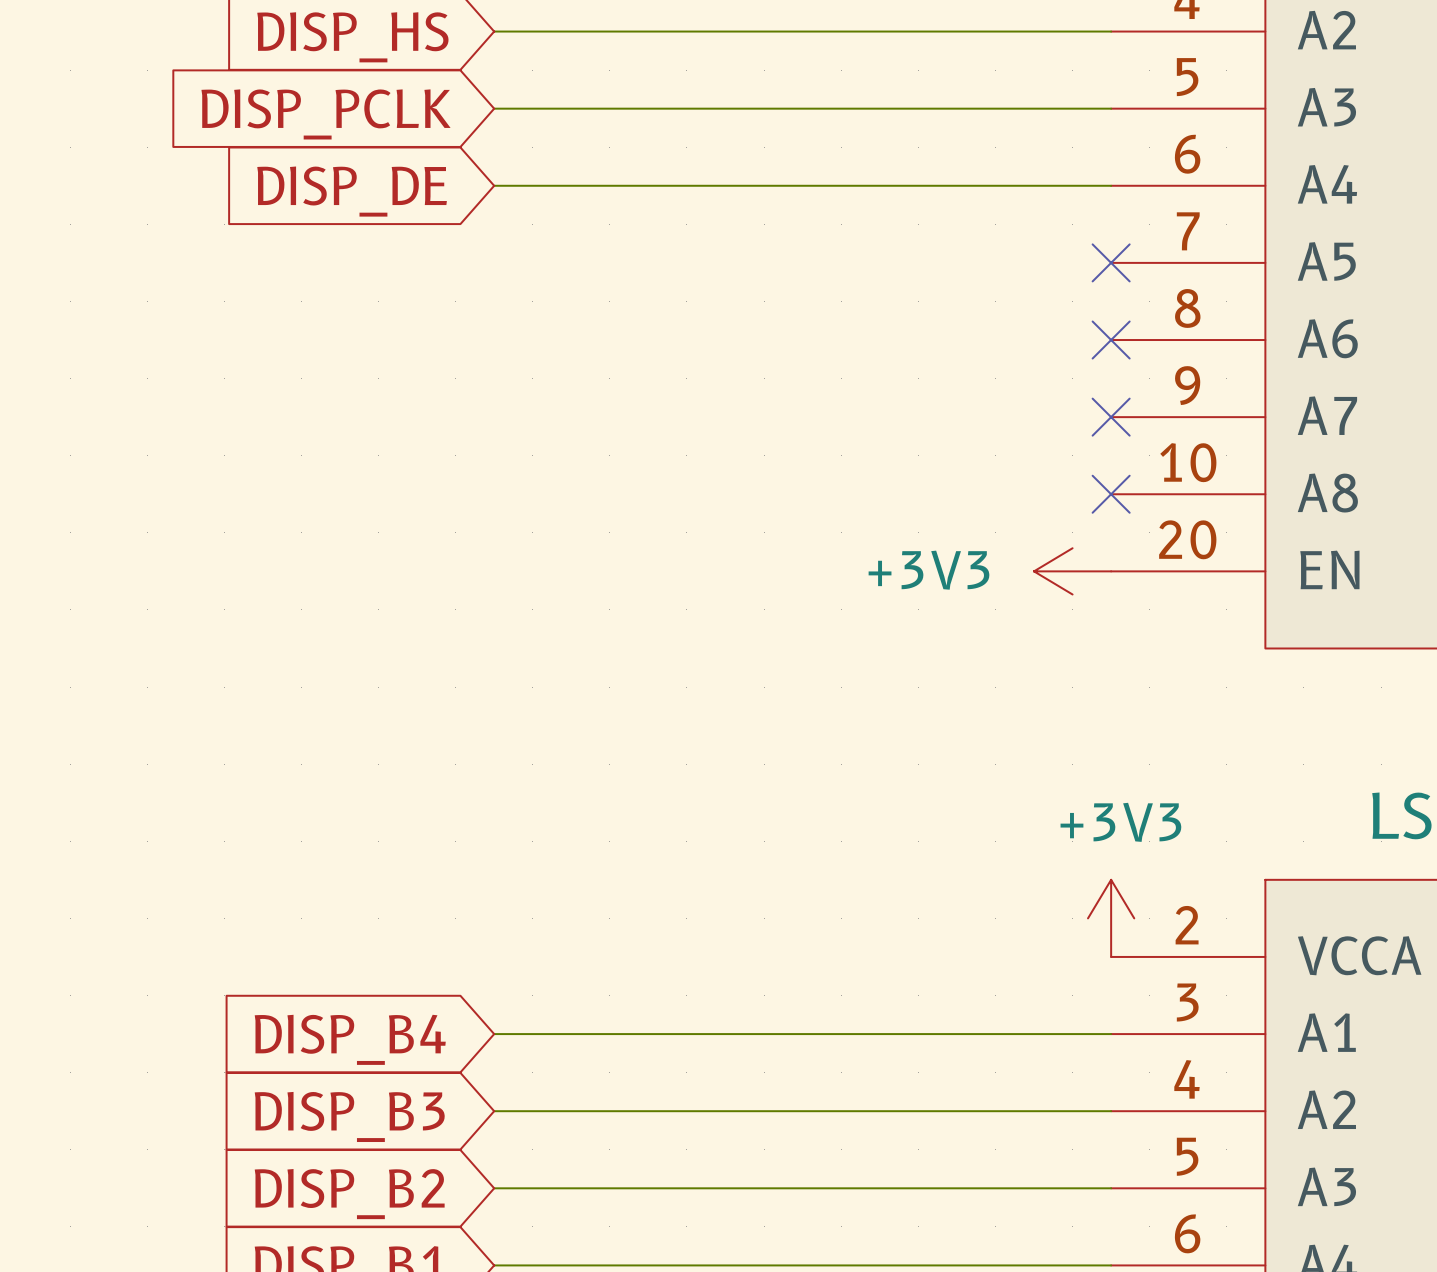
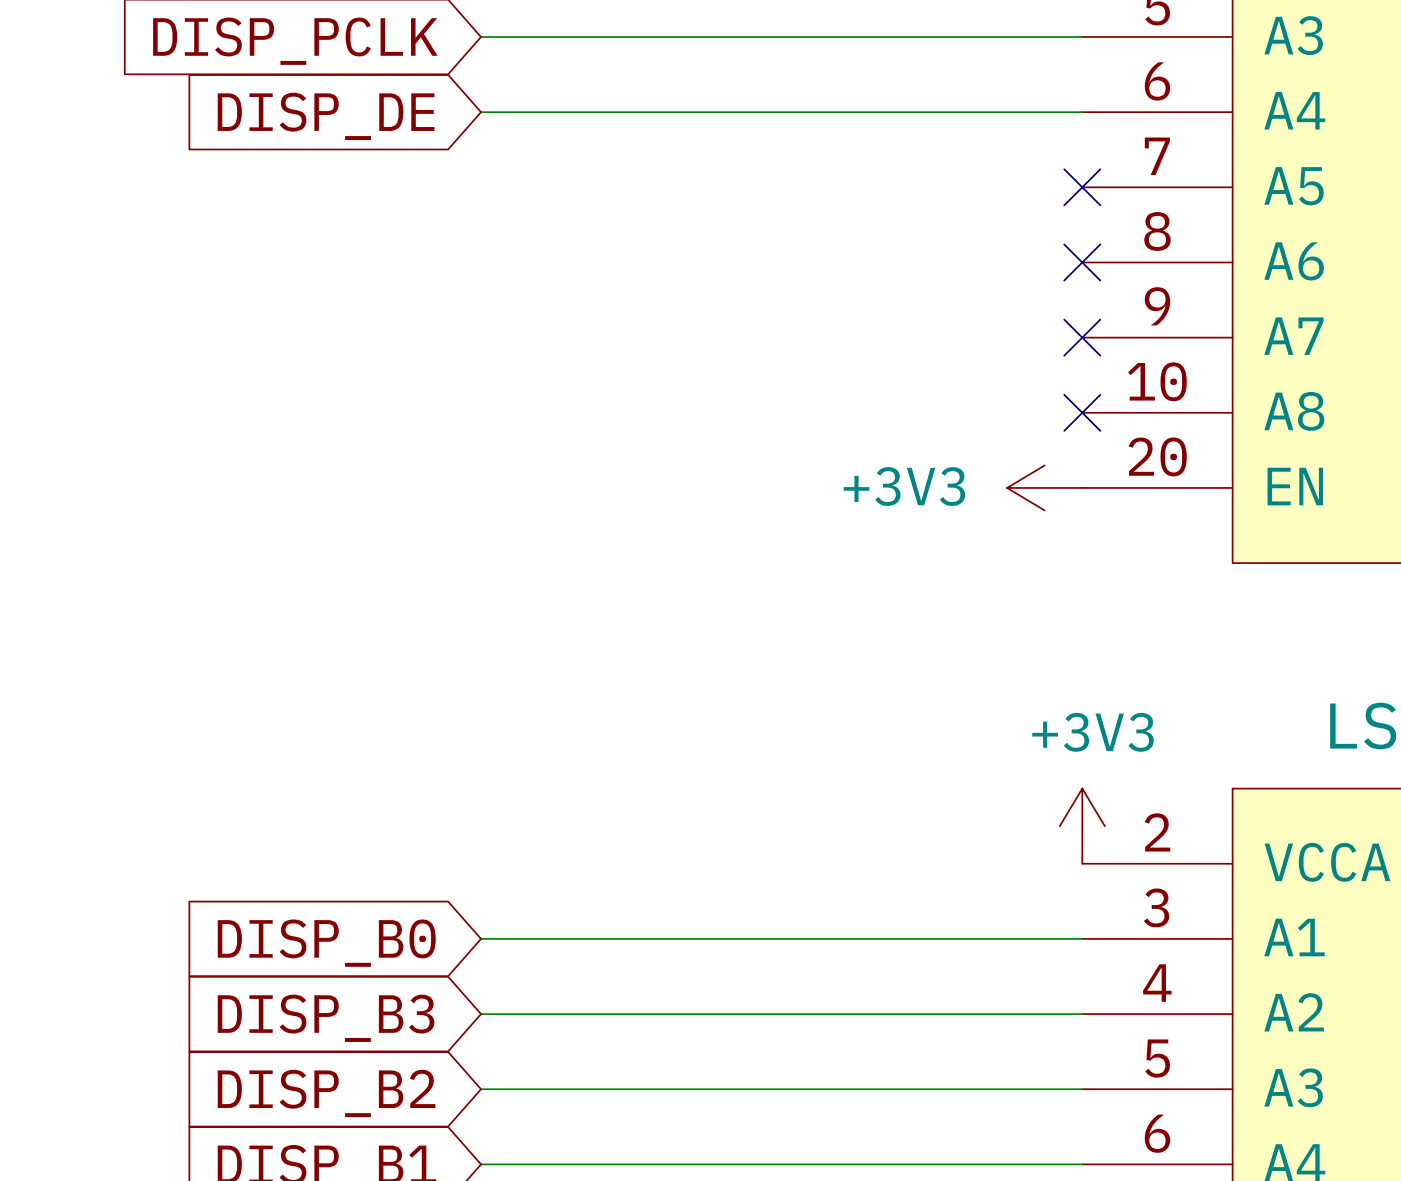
global label: DISP_B4 (350, 1039) -> DISP_B0 (326, 943)

